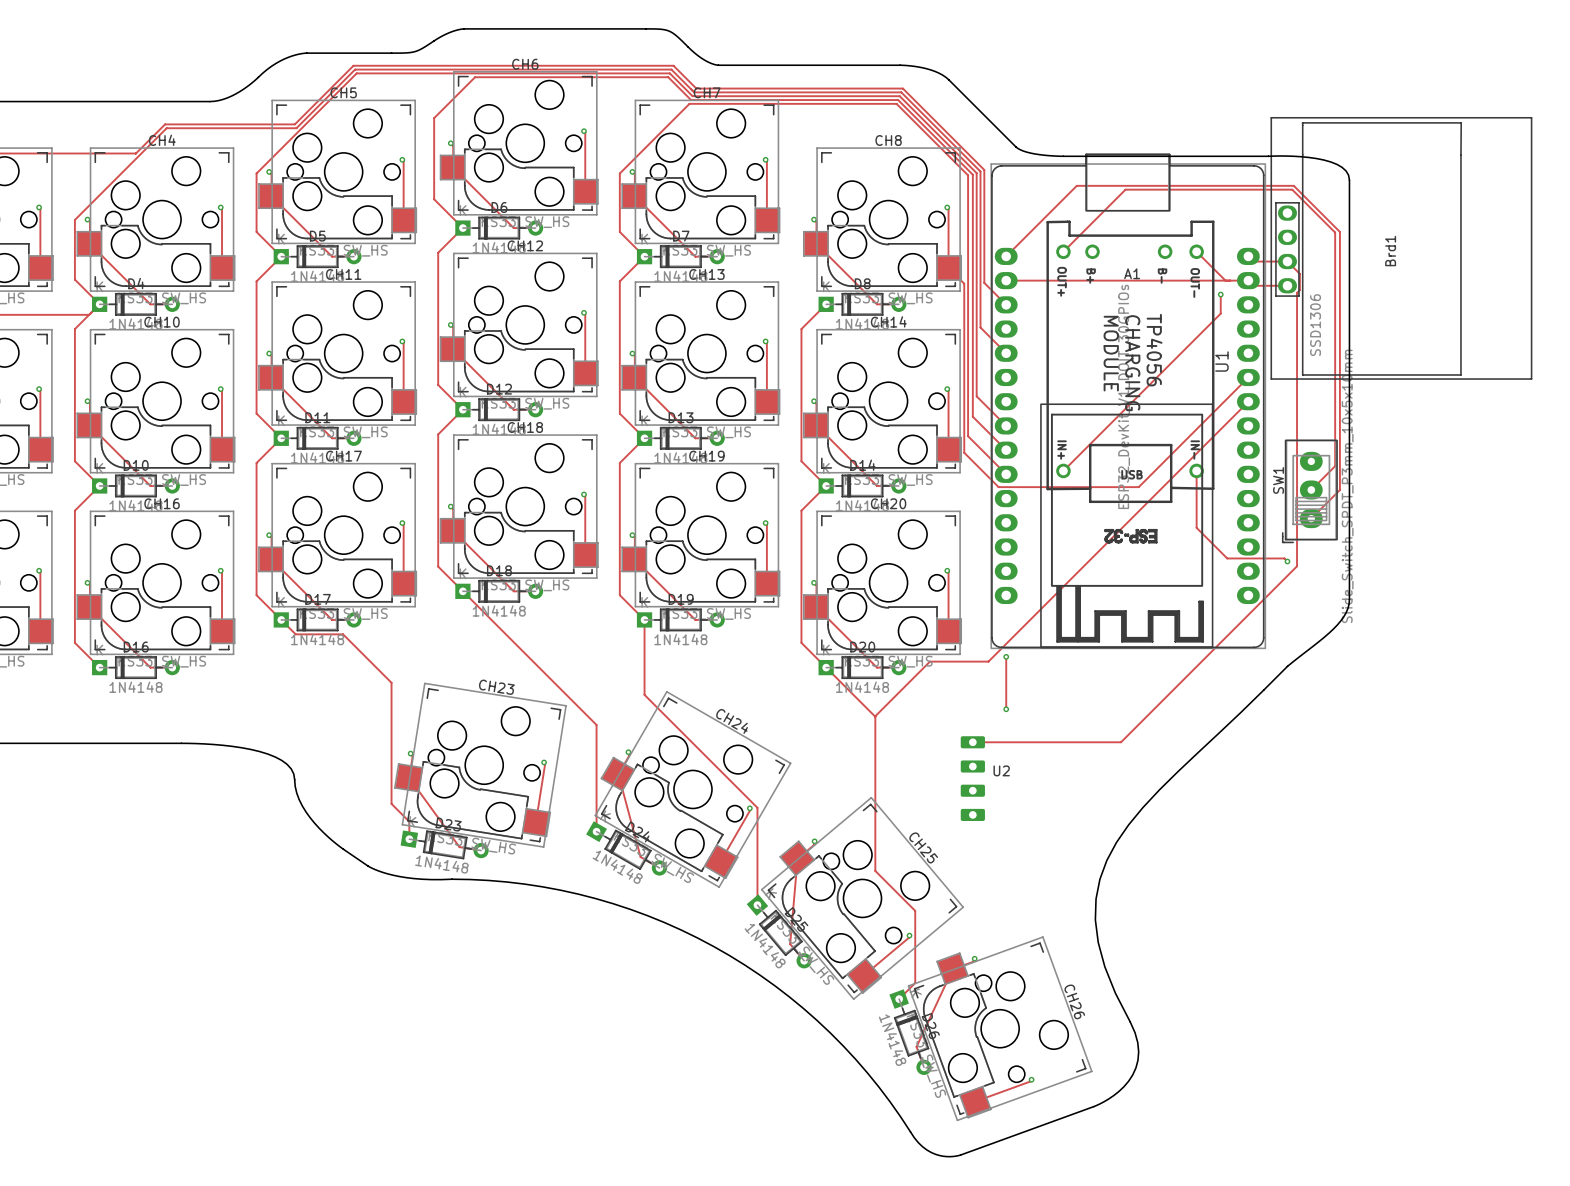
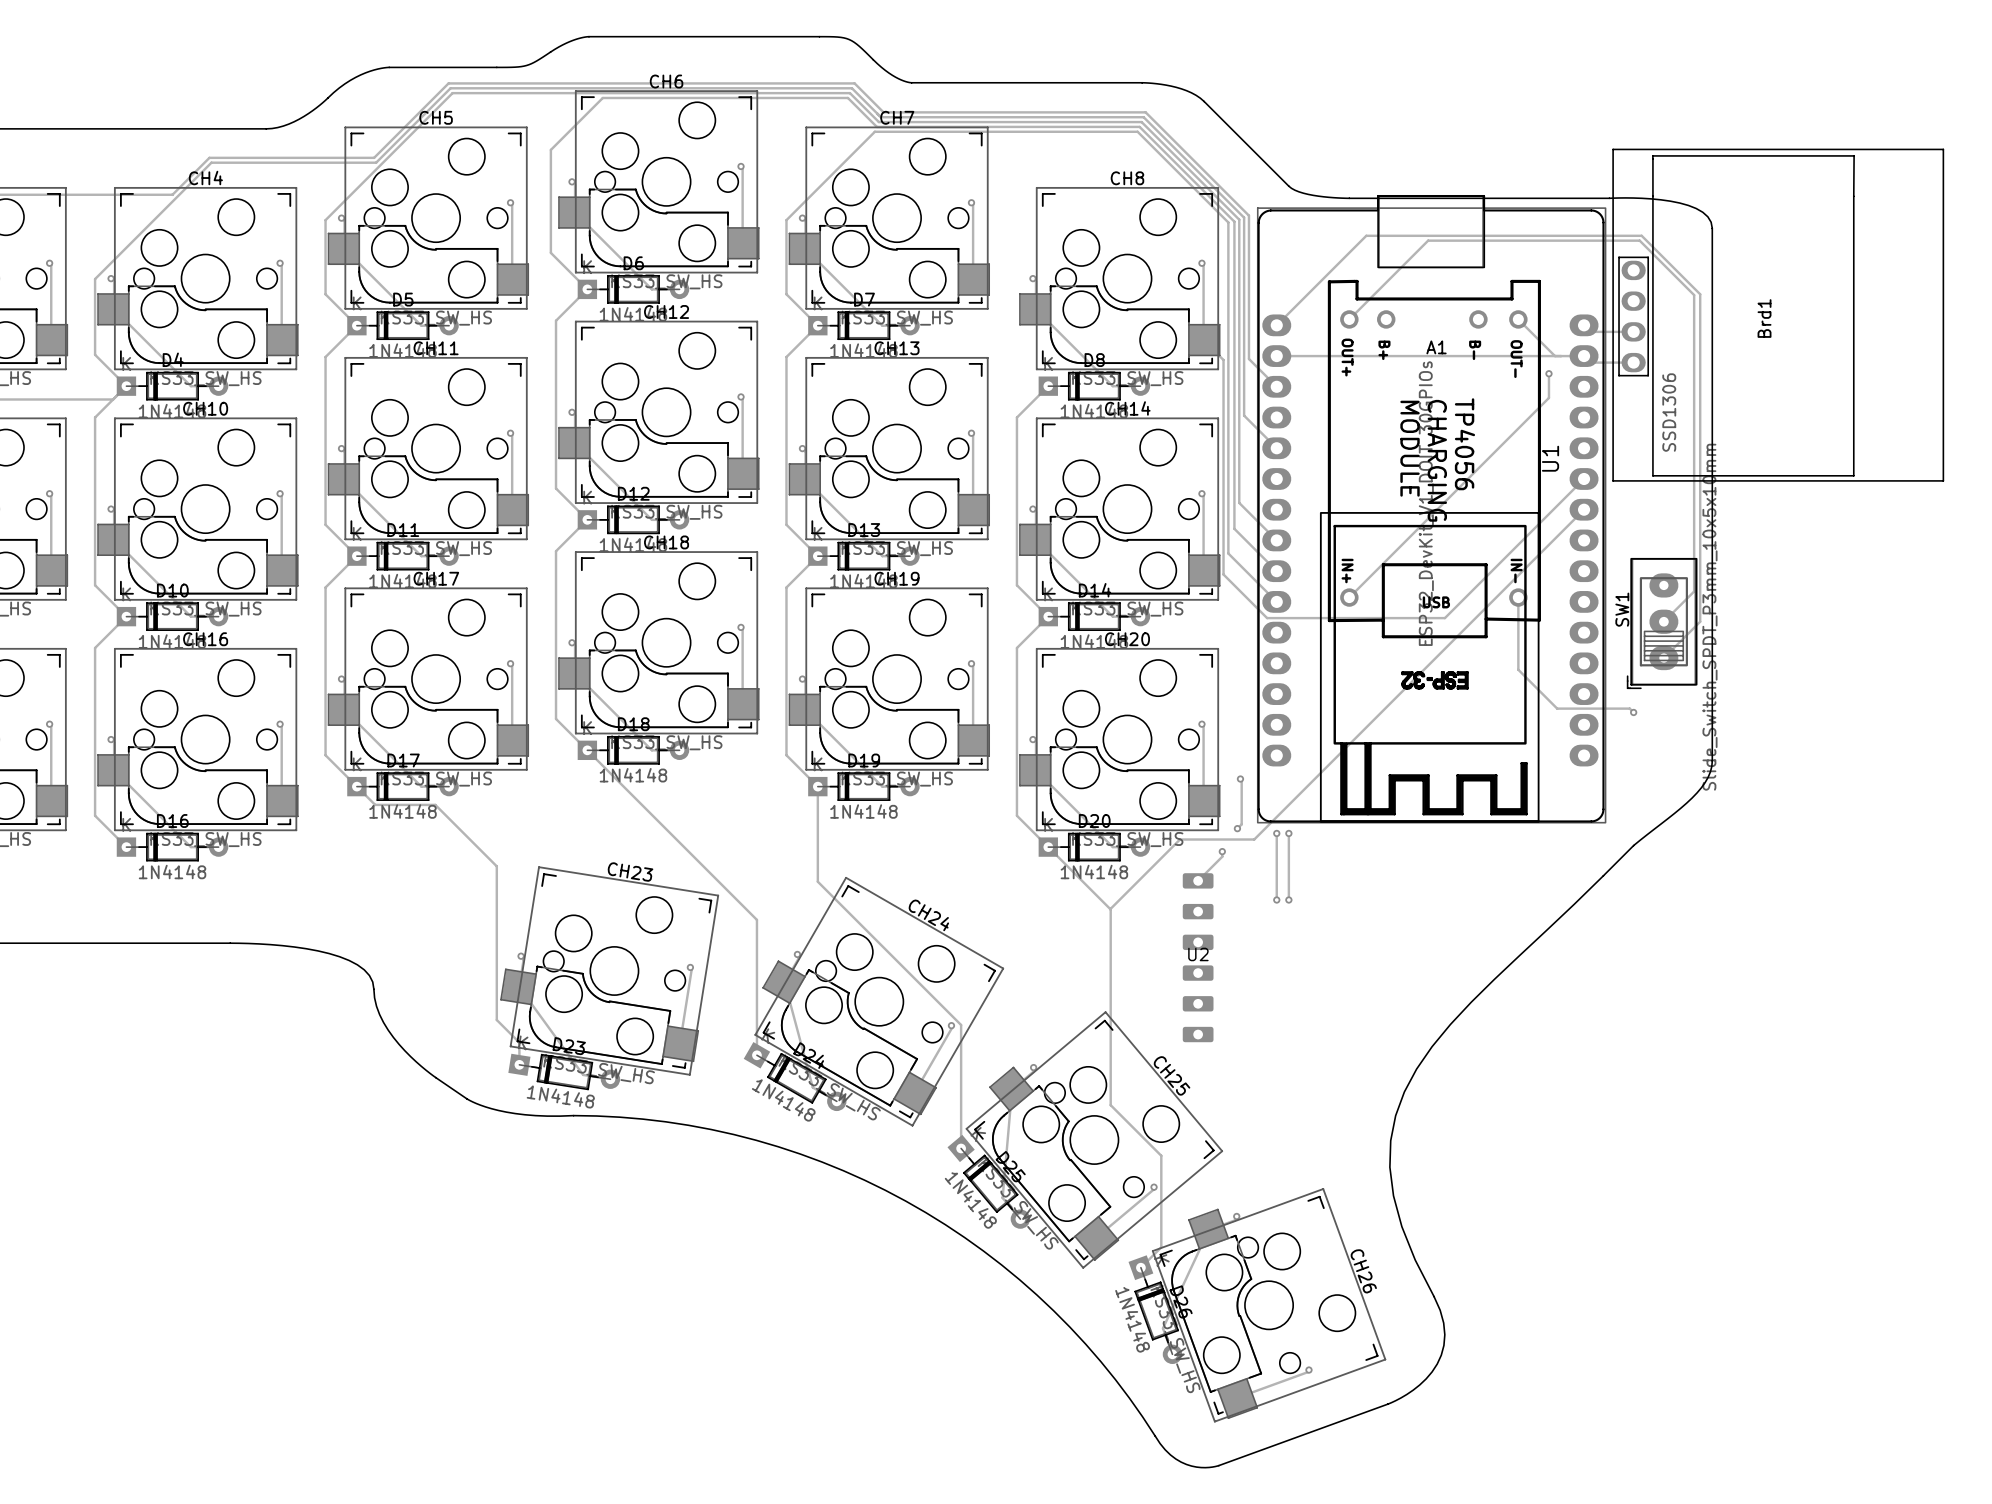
track: (1287, 261) (1299, 273) (1299, 290) (1297, 292) (1297, 566) (1121, 742) (972, 742) -> none
track: none -> (1240, 779) (1241, 824) (1237, 828)
via: none -> (1240, 779)
via: none -> (1237, 828)
track: none -> (1288, 833) (1288, 900)
via: none -> (1288, 833)
track: none -> (1222, 851) (1222, 856) (1198, 880)
via: none -> (1222, 851)
via: none -> (1288, 900)
U2 footprint: [960, 736, 985, 821] -> [1182, 873, 1214, 1043]
U2 name position: U2 (1001, 770) -> U2 (1198, 954)

